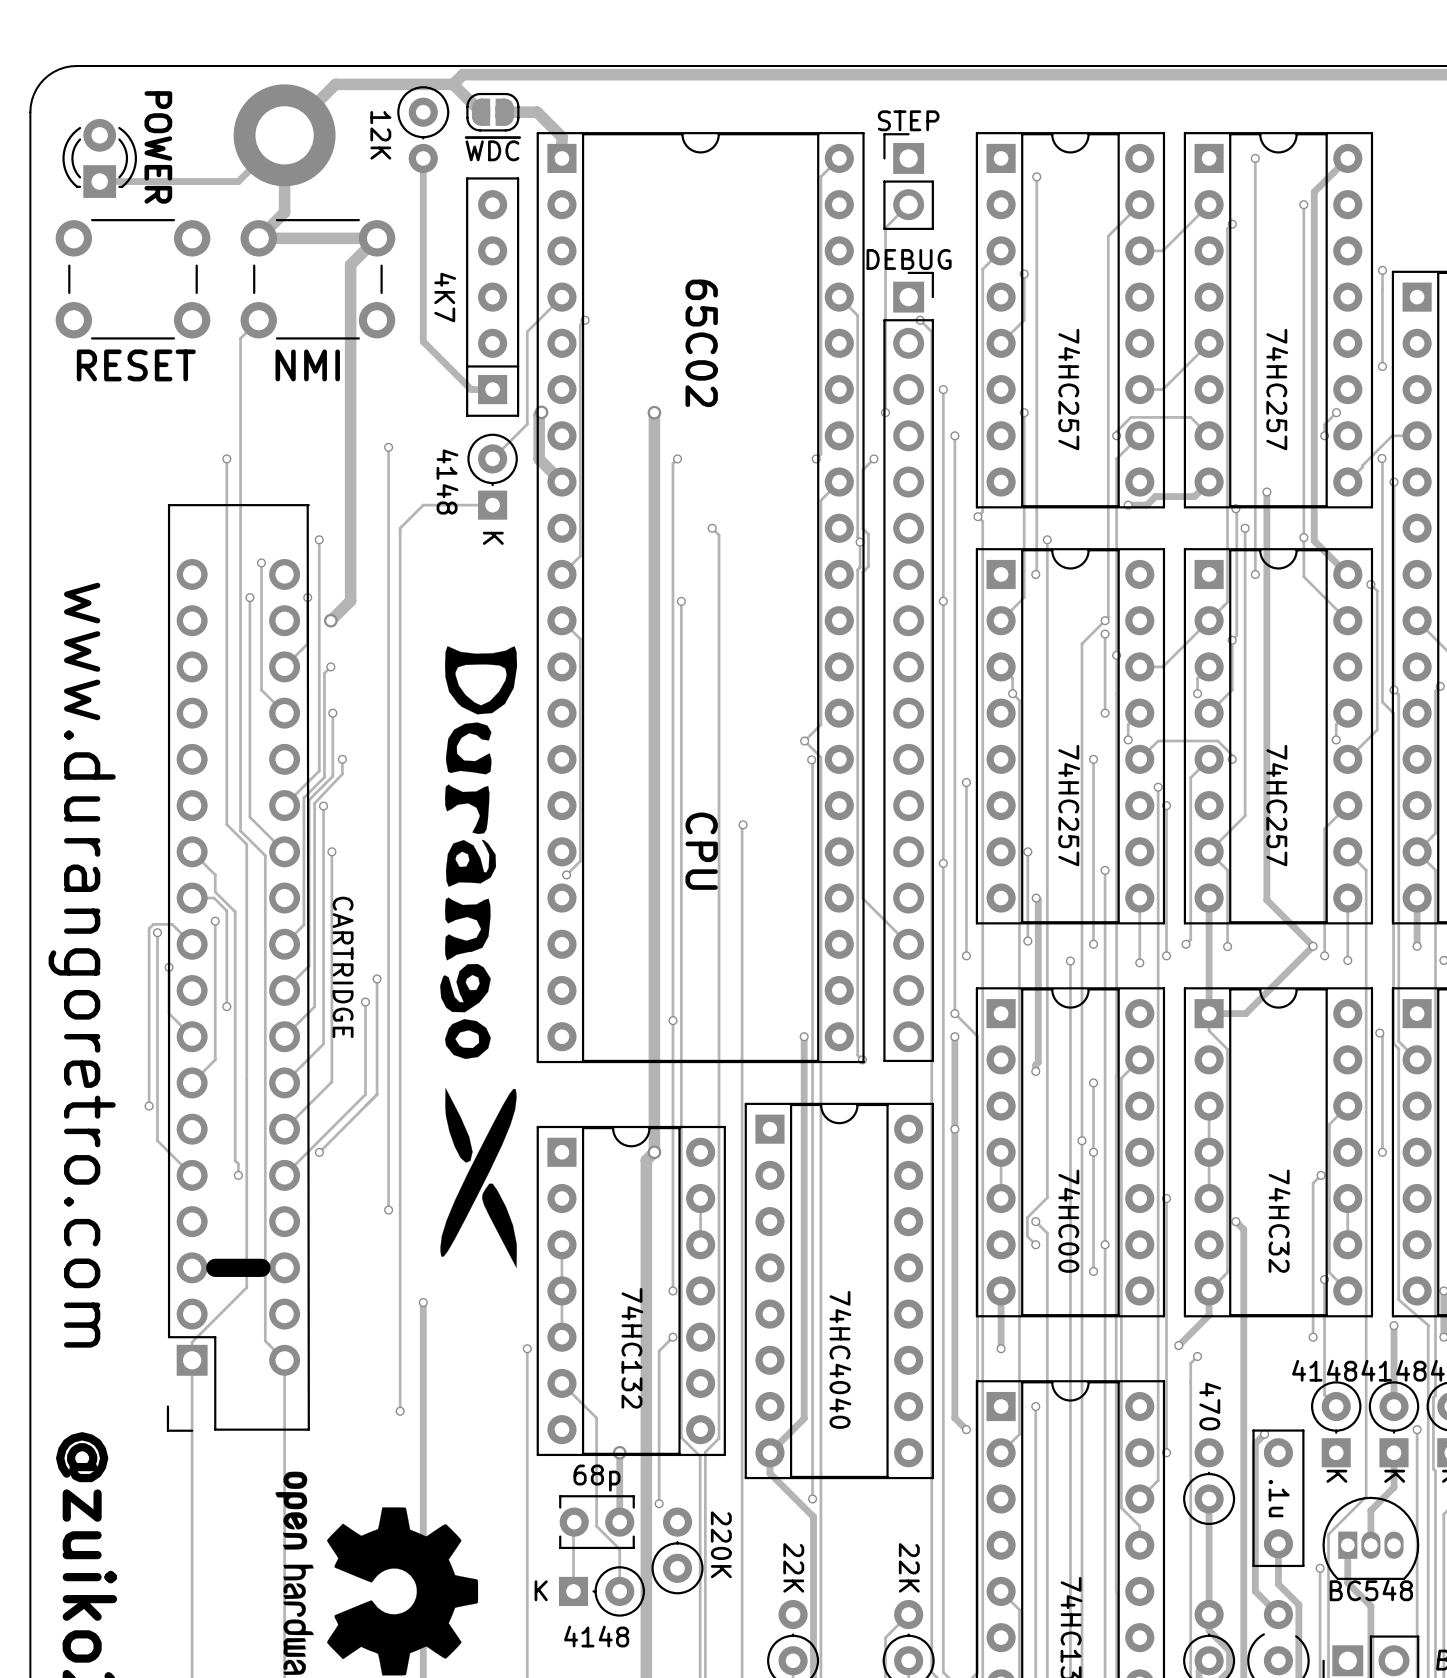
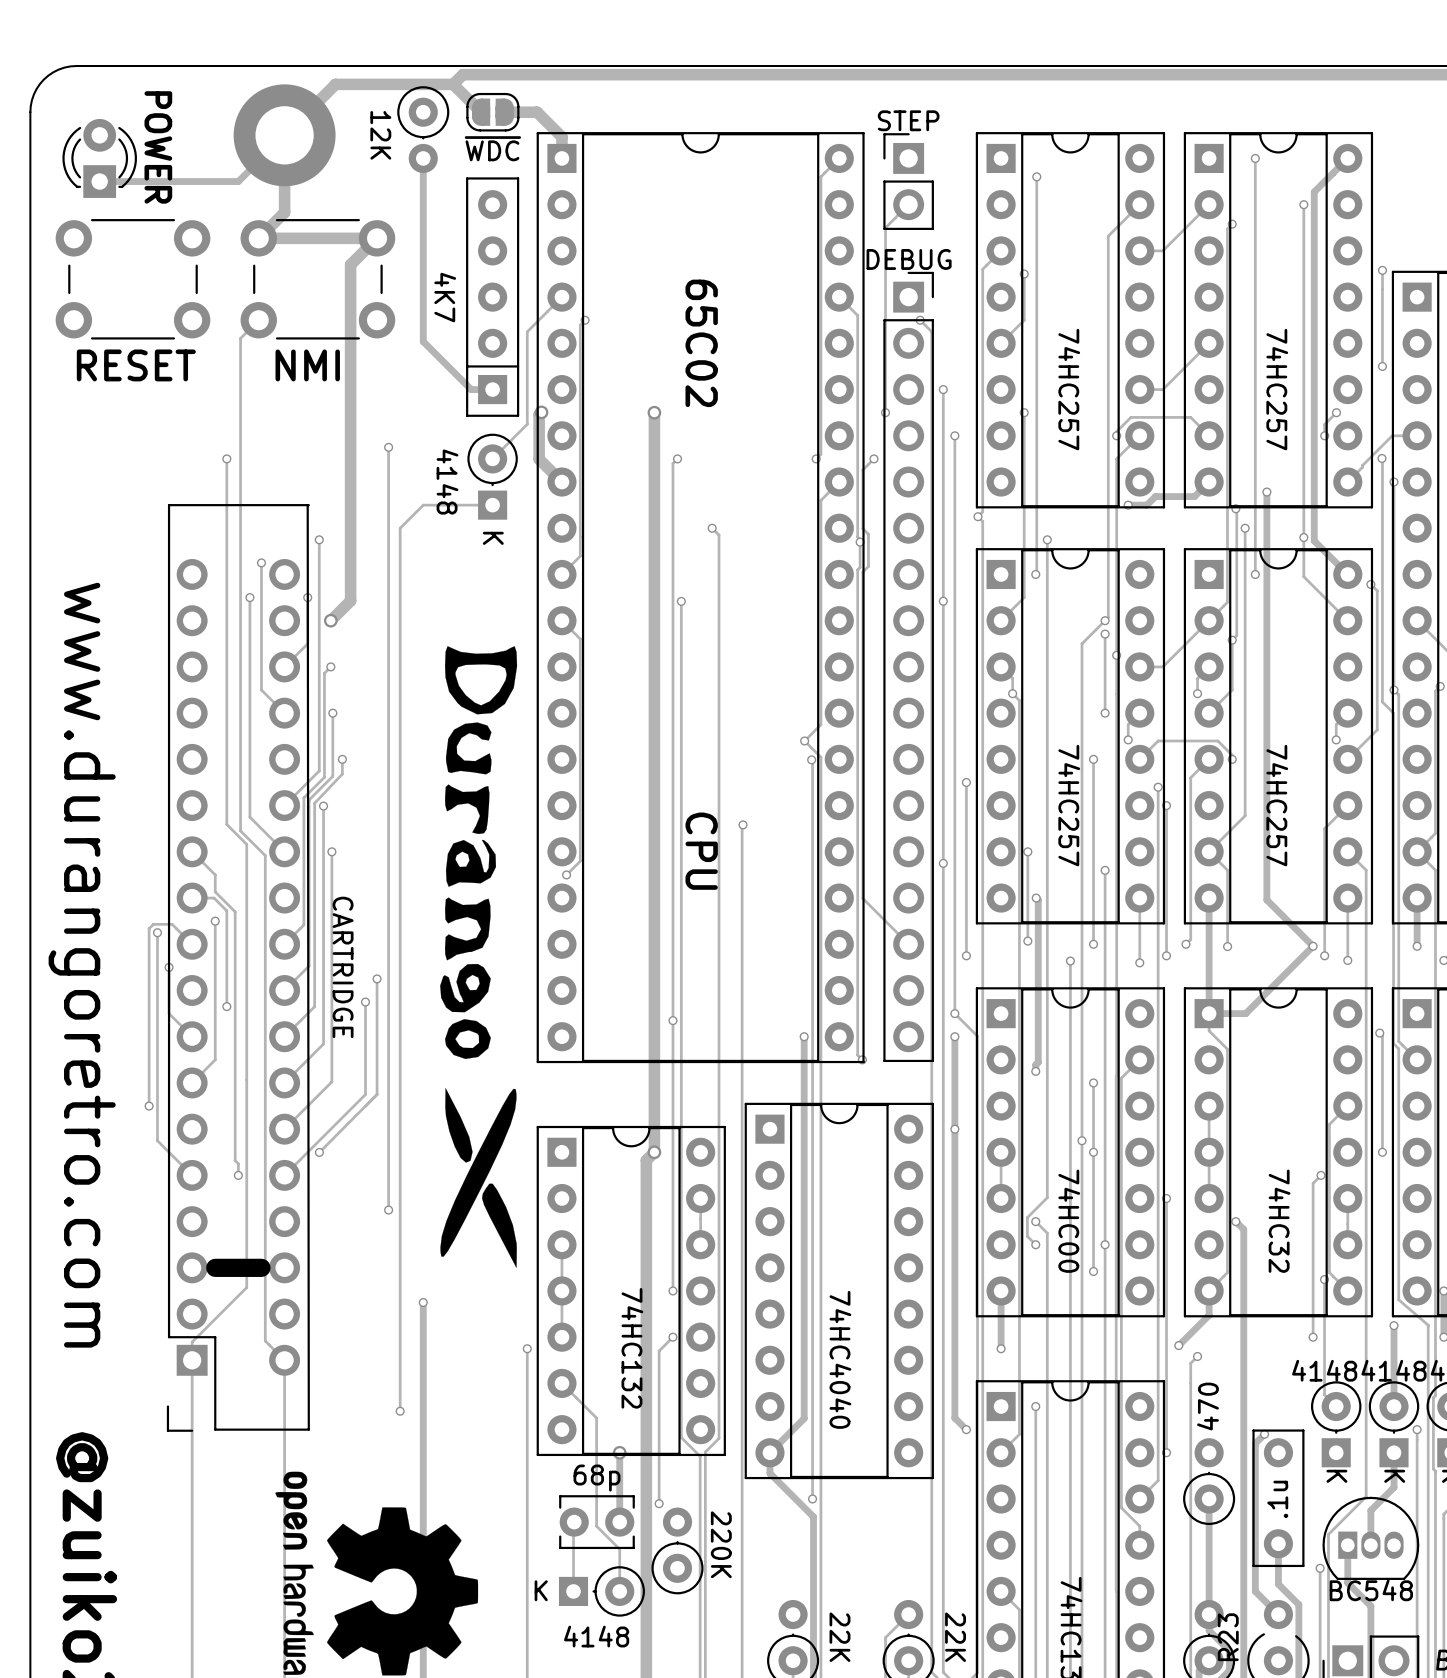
part value rotation: 0° (1210, 1406) -> 180° (1207, 1406)
part value rotation: 0° (1279, 1498) -> 180° (1277, 1499)
part value position: 22K (793, 1567) -> 22K (839, 1637)
part value position: 22K (909, 1567) -> 22K (955, 1637)
R23 name: none -> R23 (1228, 1637)

